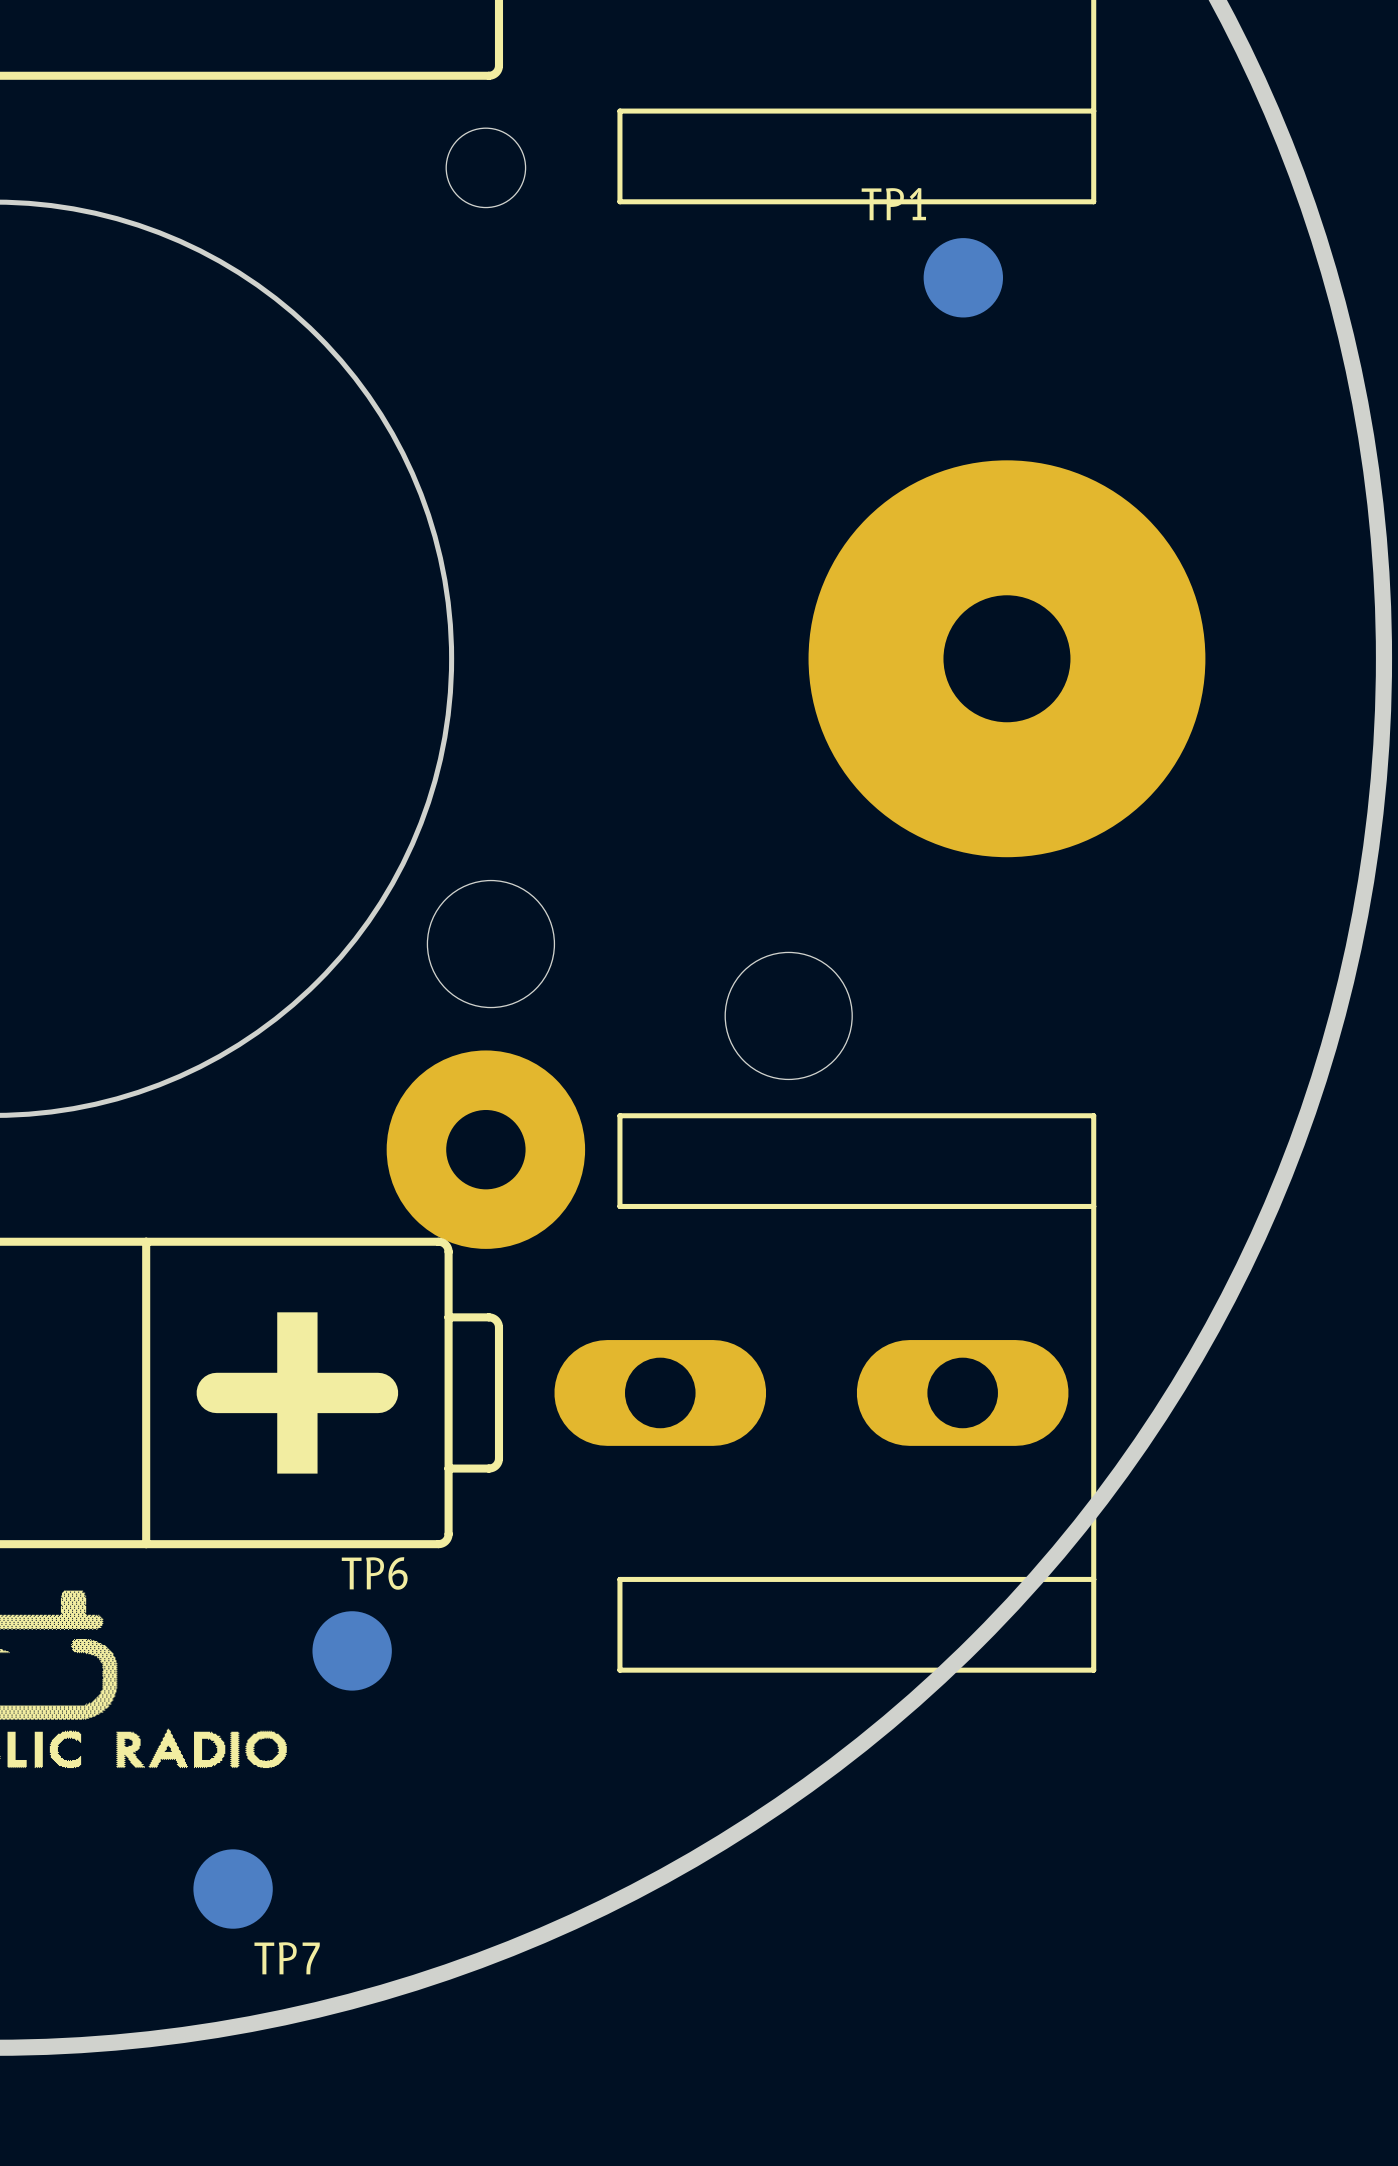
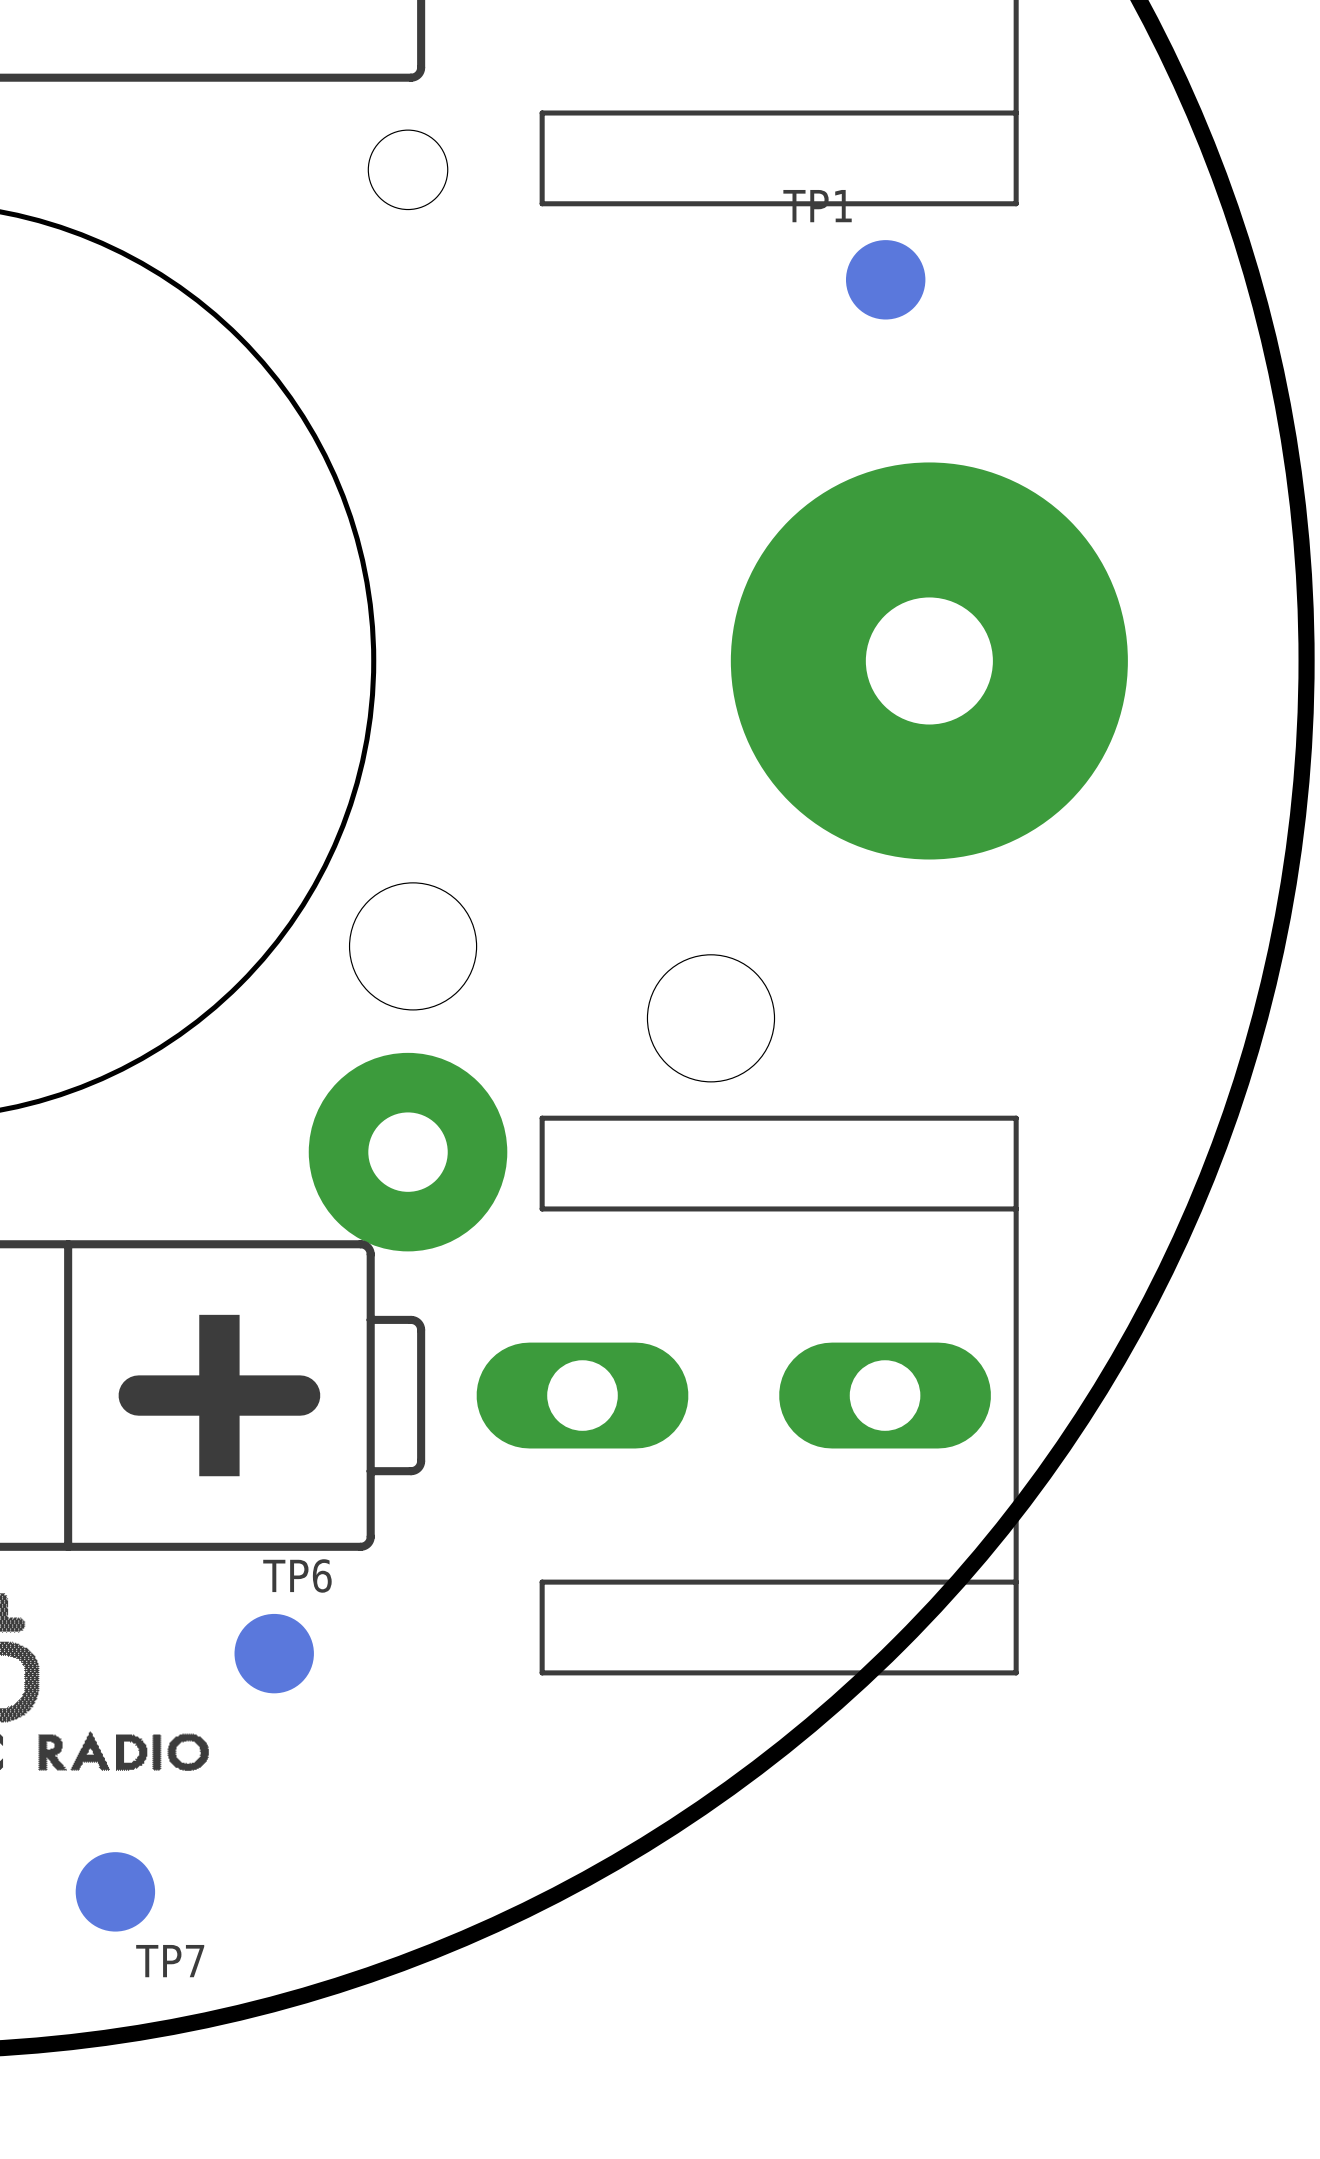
TP7 position: (233, 1889) -> (115, 1891)

